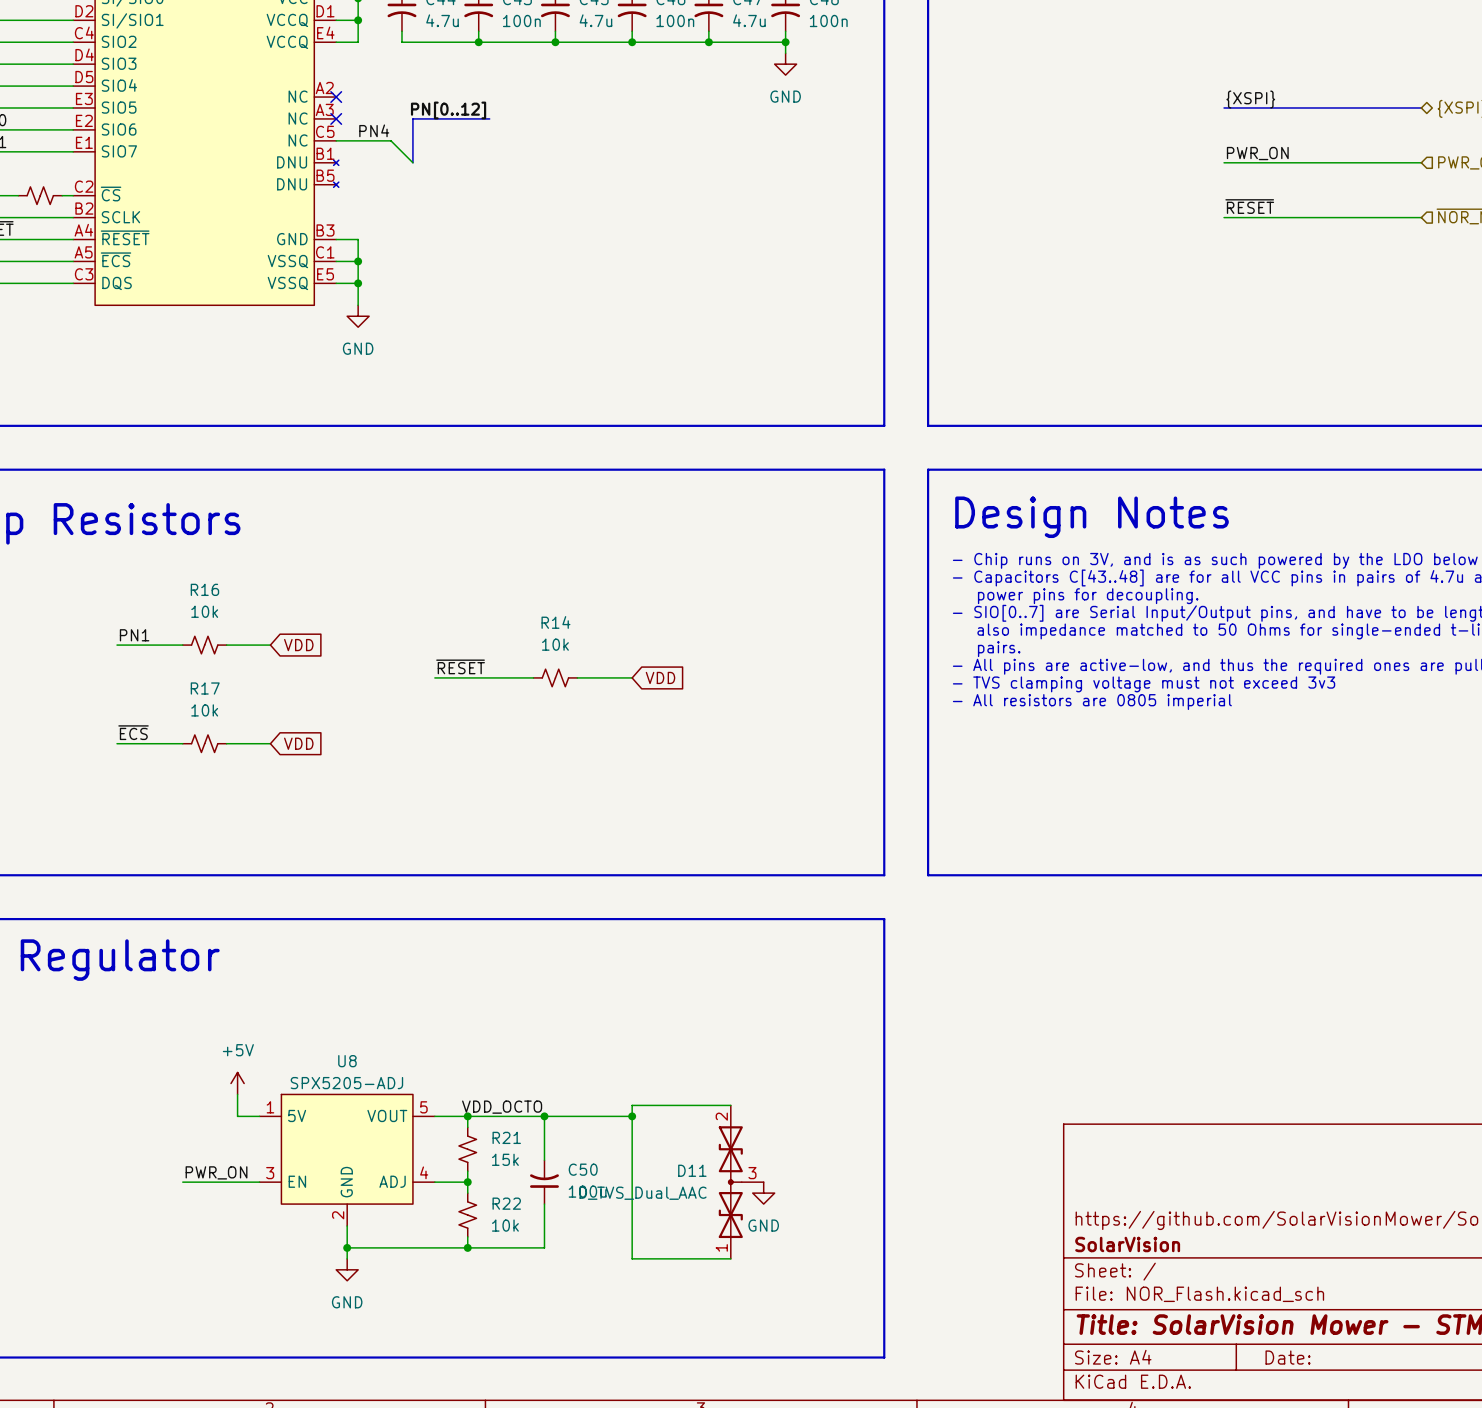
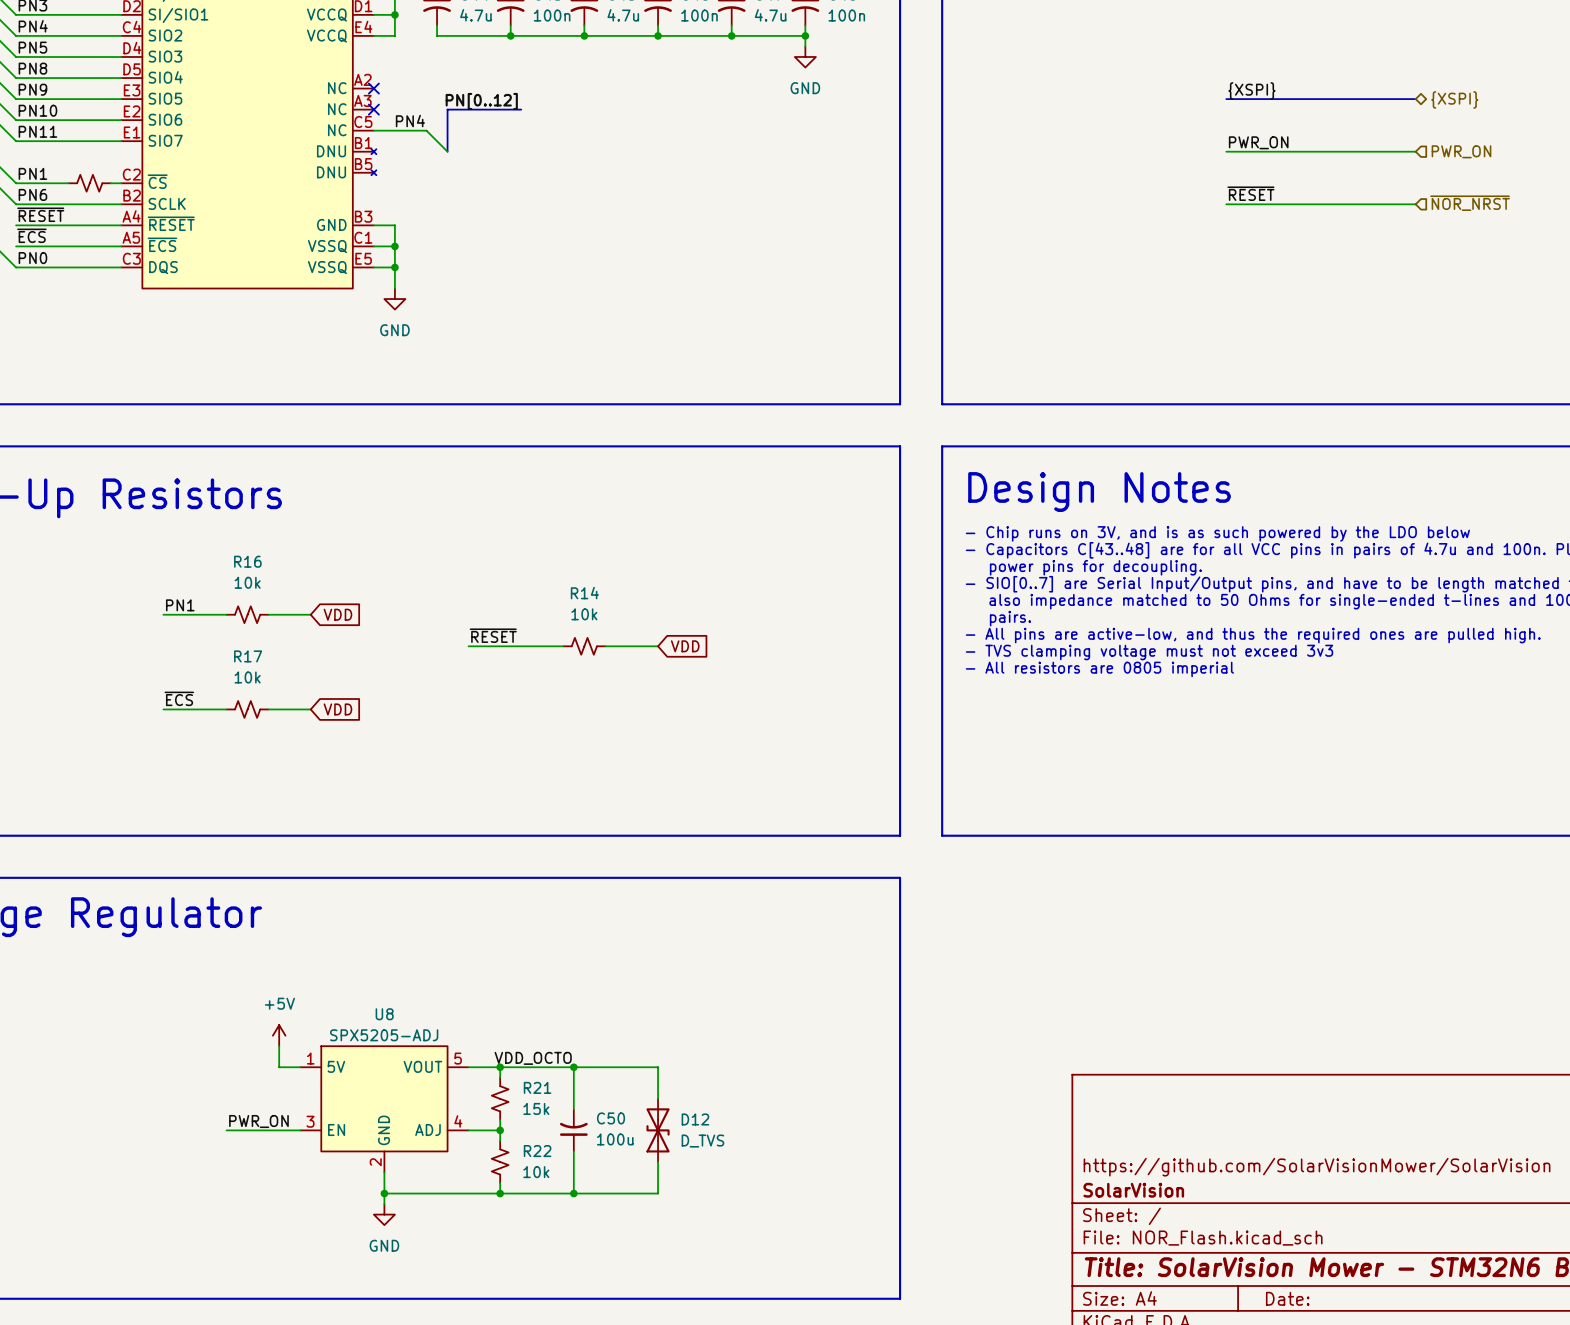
wire: (730, 1105) (632, 1105) (632, 1116) -> none
junction: (632, 1116) -> none
D12: none -> D_TVS (658, 1130)
D11: D_TVS_Dual_AAC (741, 1182) -> none
power symbol: GND (763, 1193) -> none
junction: none -> (573, 1193)
wire: (632, 1247) (632, 1258) (730, 1258) -> (658, 1193) (573, 1193)

